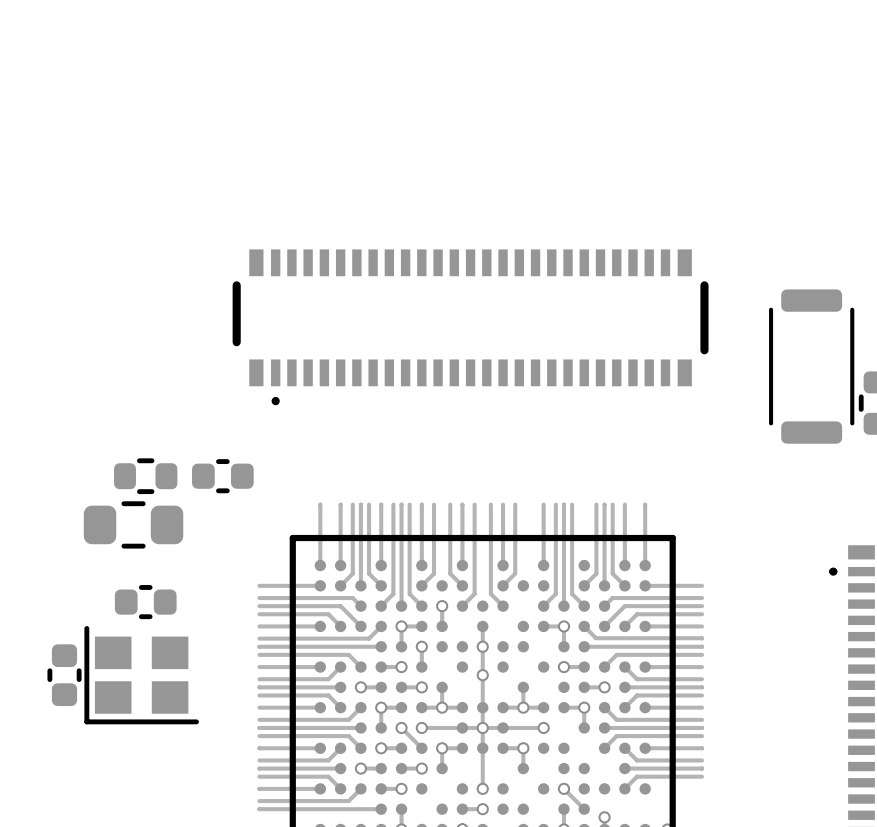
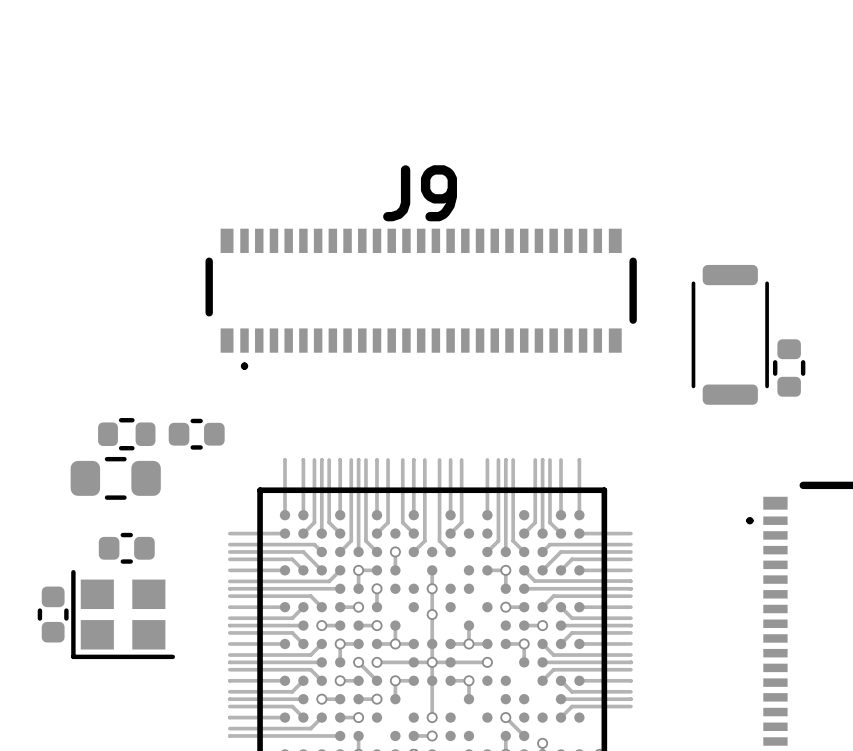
J9 name: none -> J9 (420, 193)

